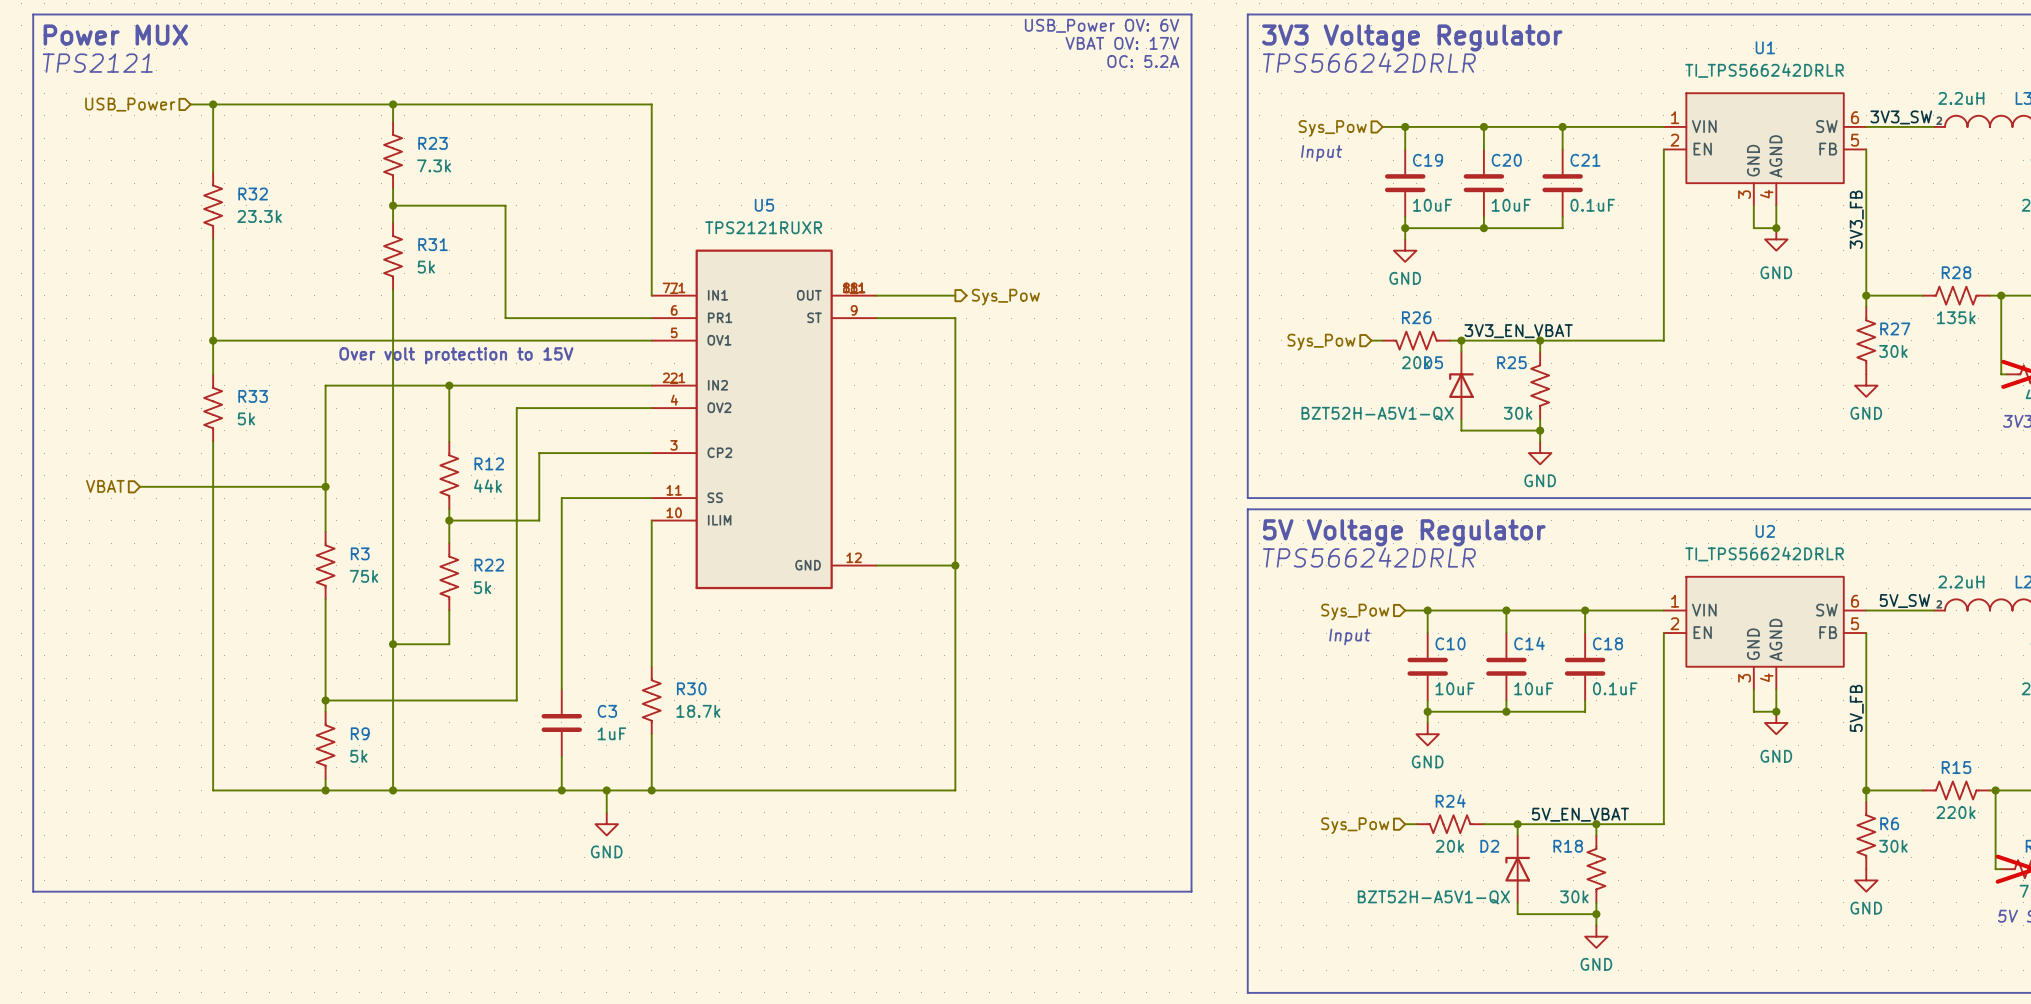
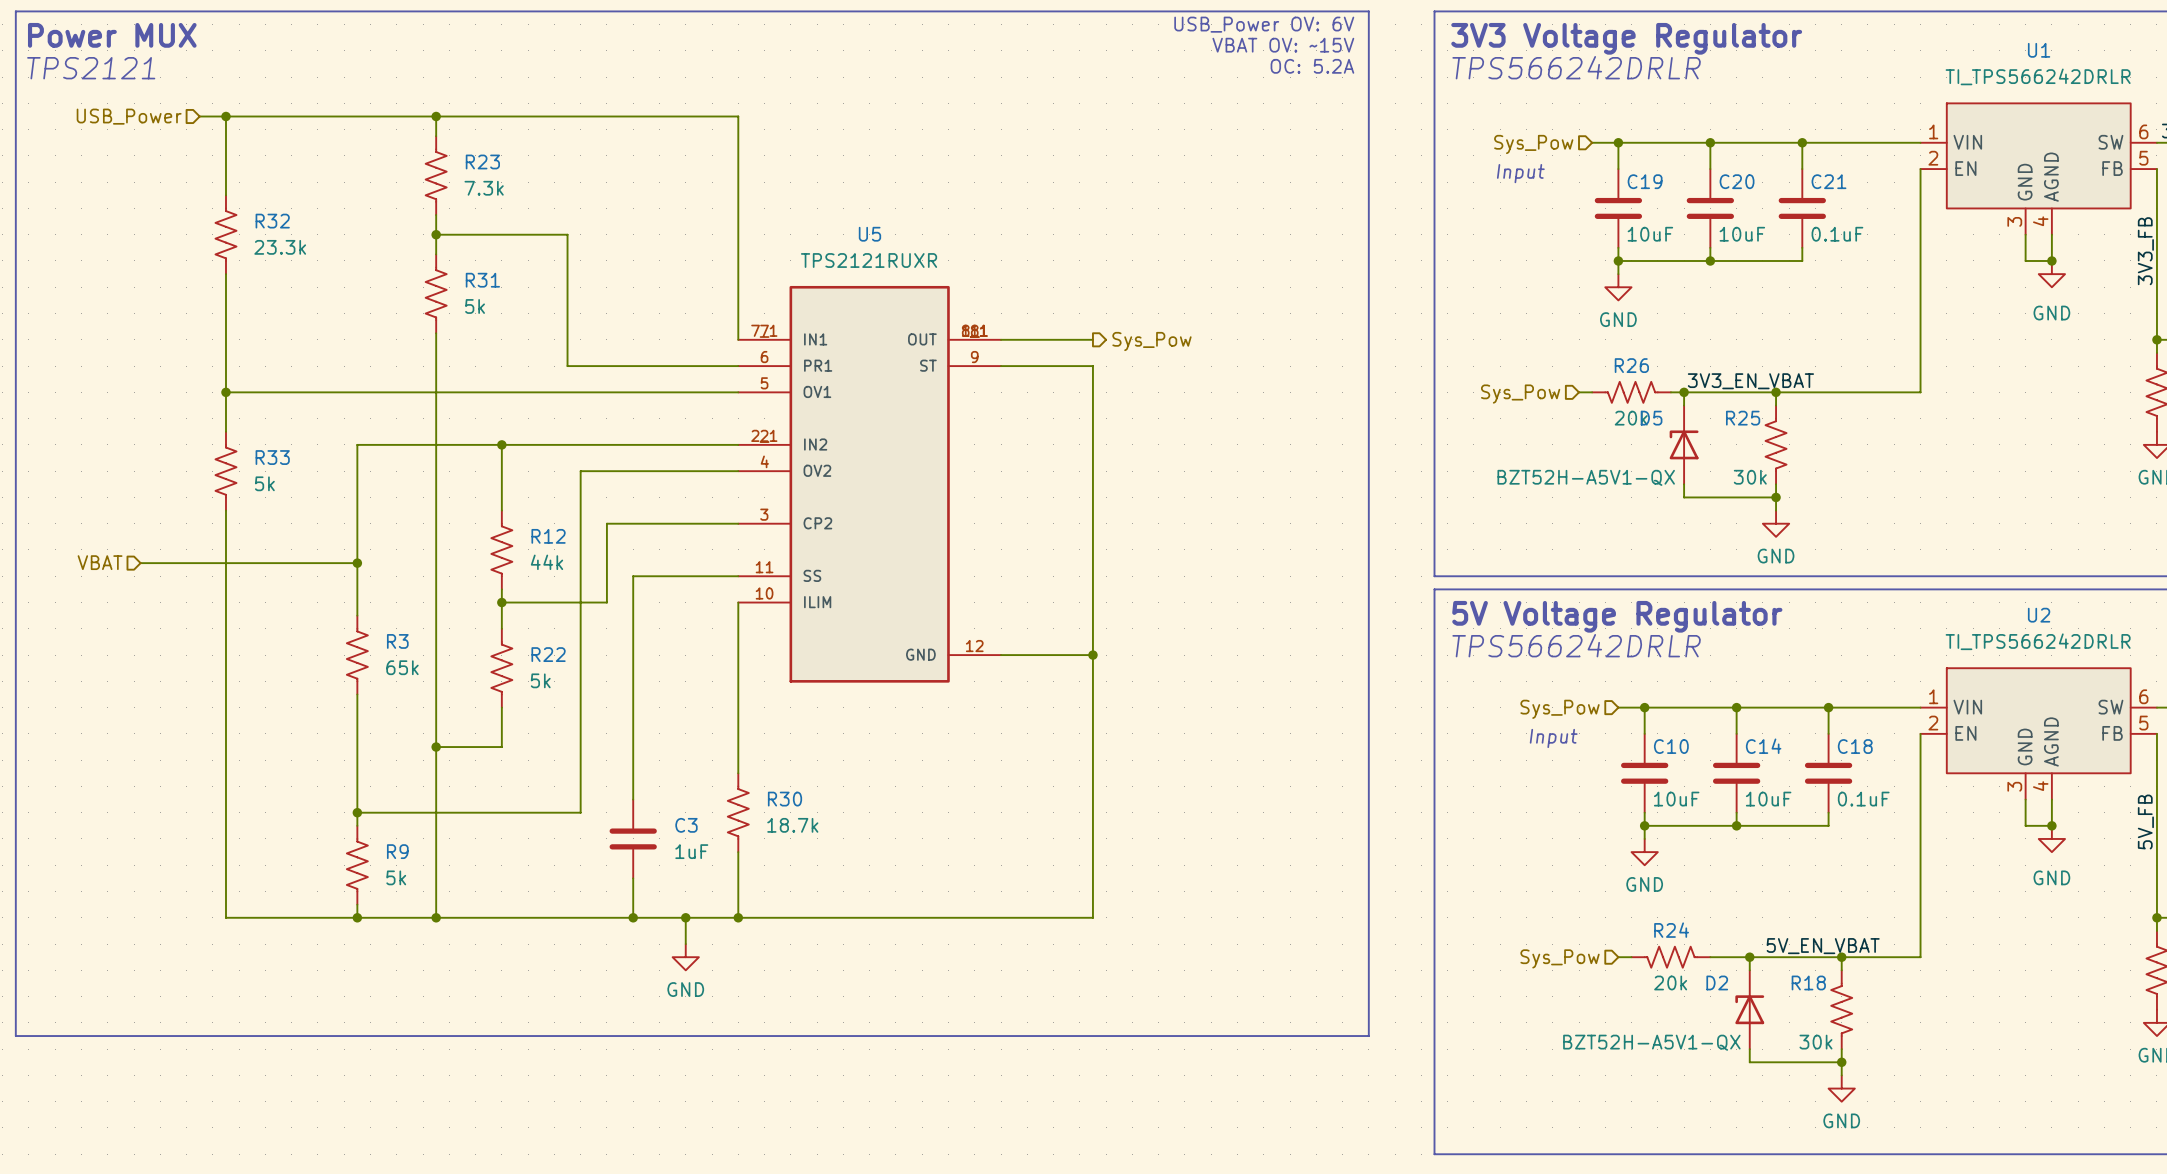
text: VBAT OV: 17V (1122, 43) -> VBAT OV: ~15V (1283, 45)
text: Over volt protection to 15V (456, 355) -> none
R3 value: 75k (363, 576) -> 65k (402, 667)

